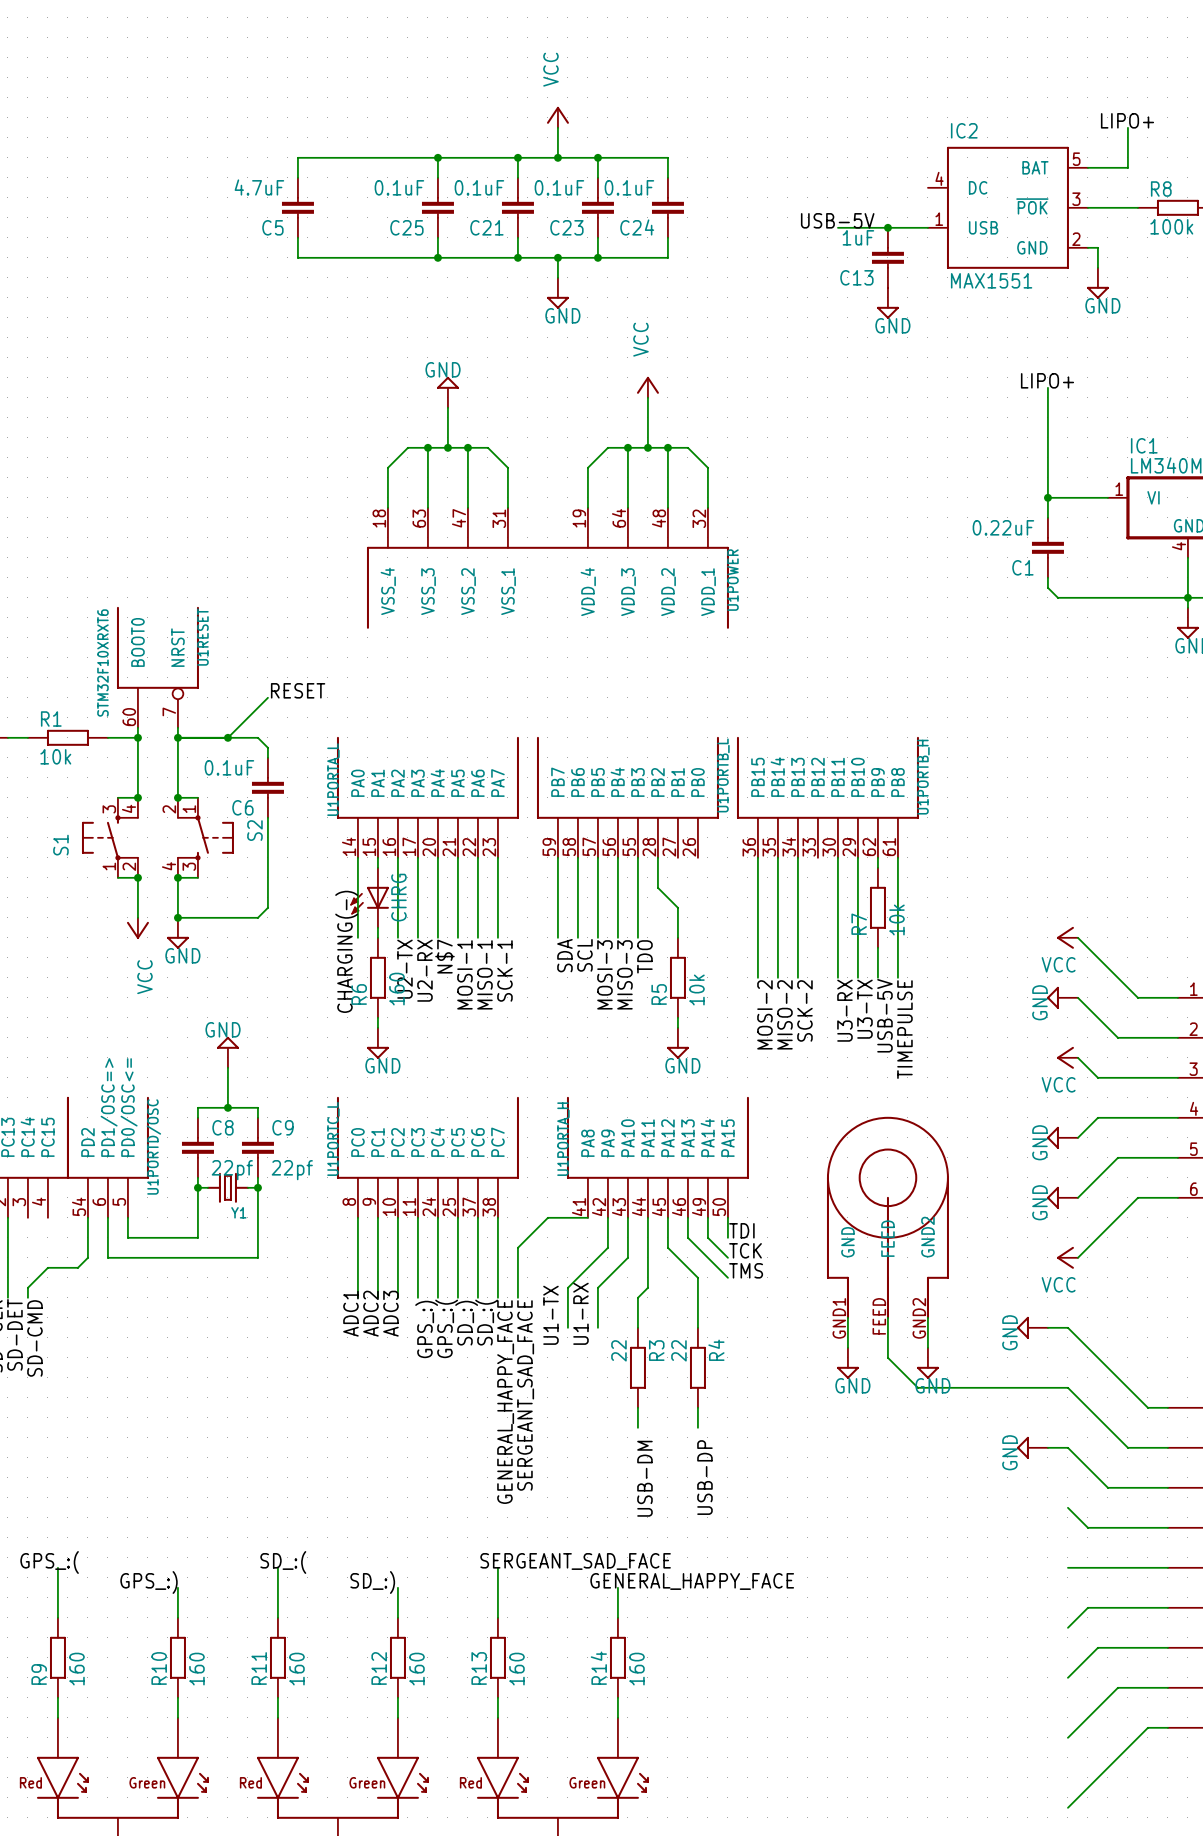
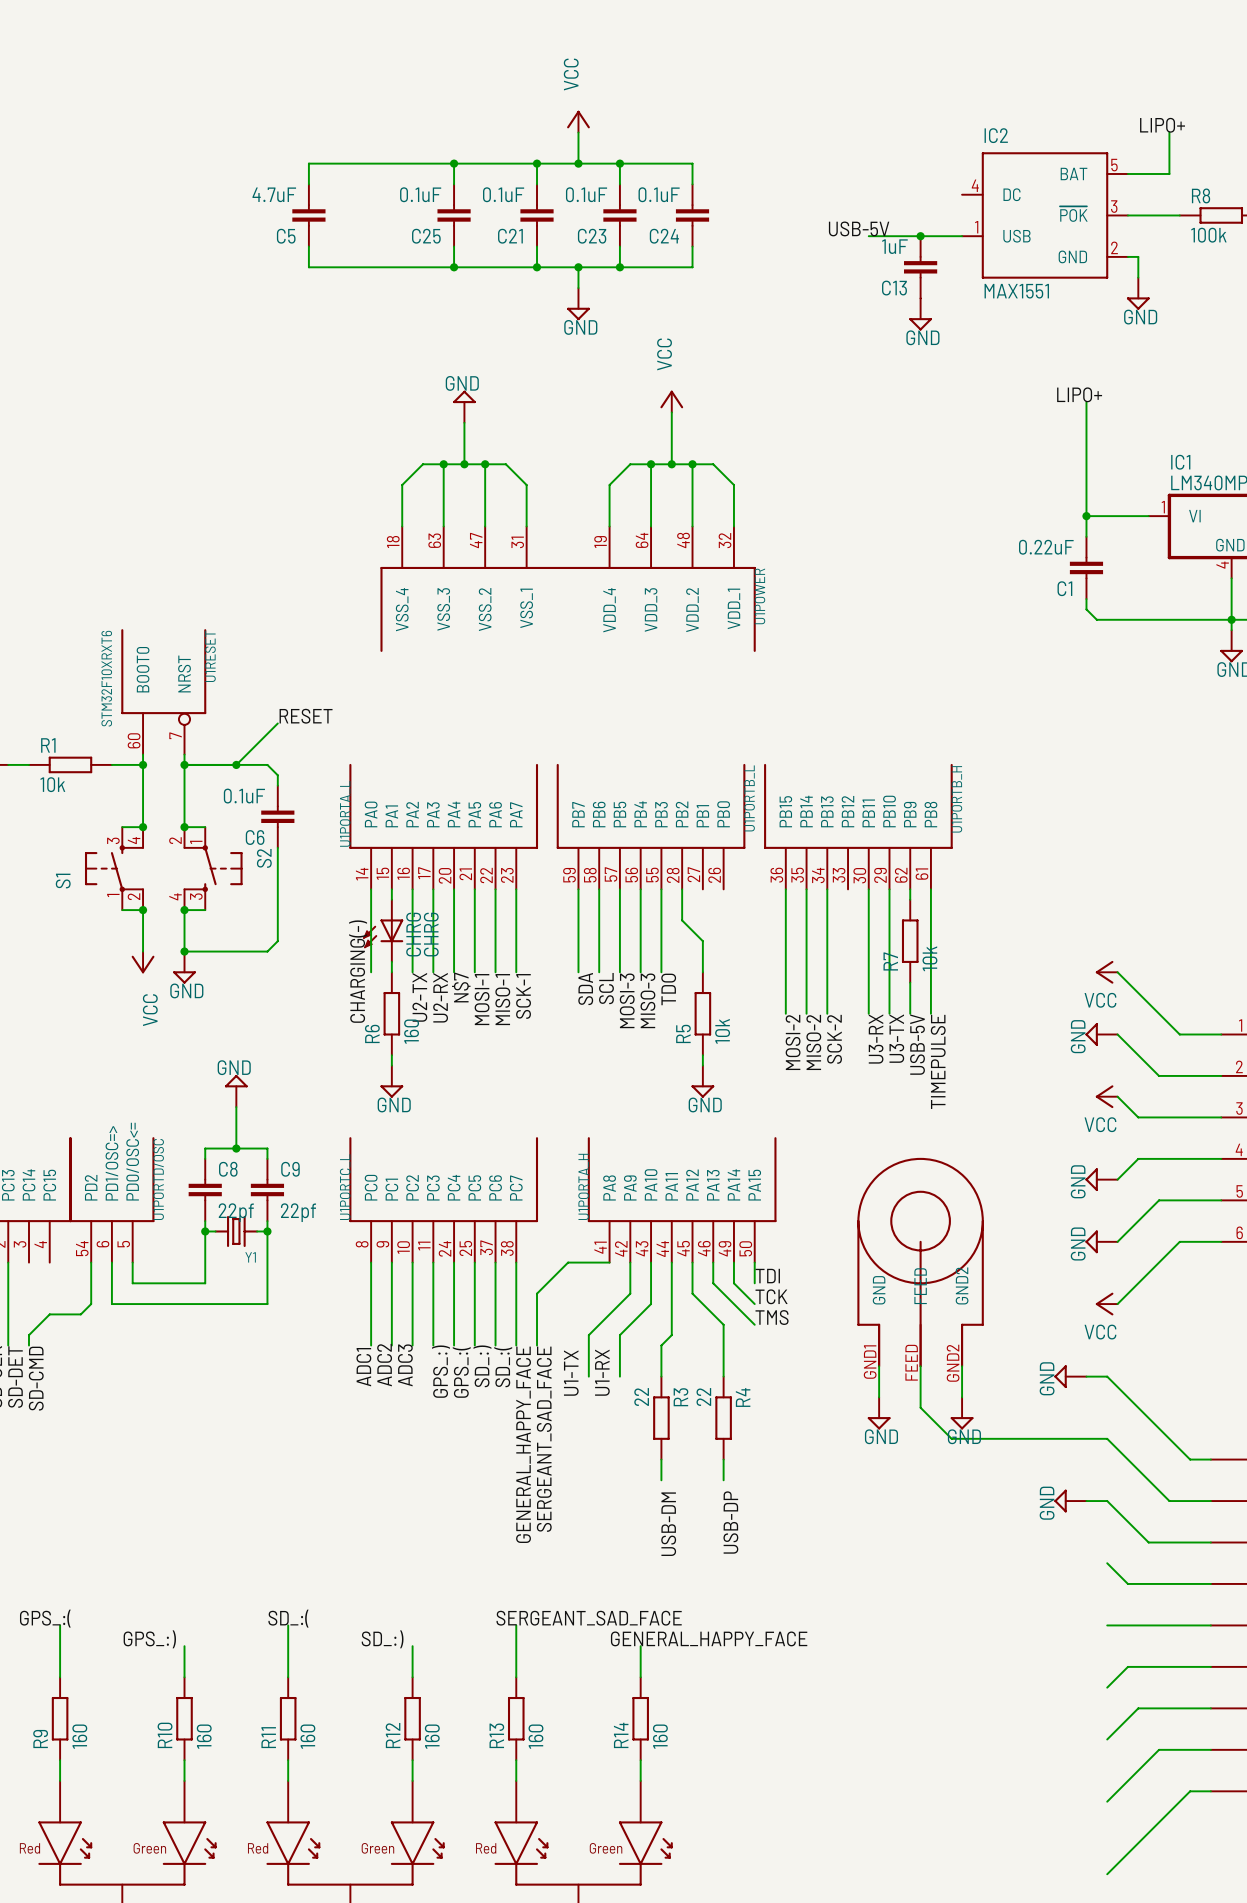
CHRG value: none -> CHRG (431, 934)

